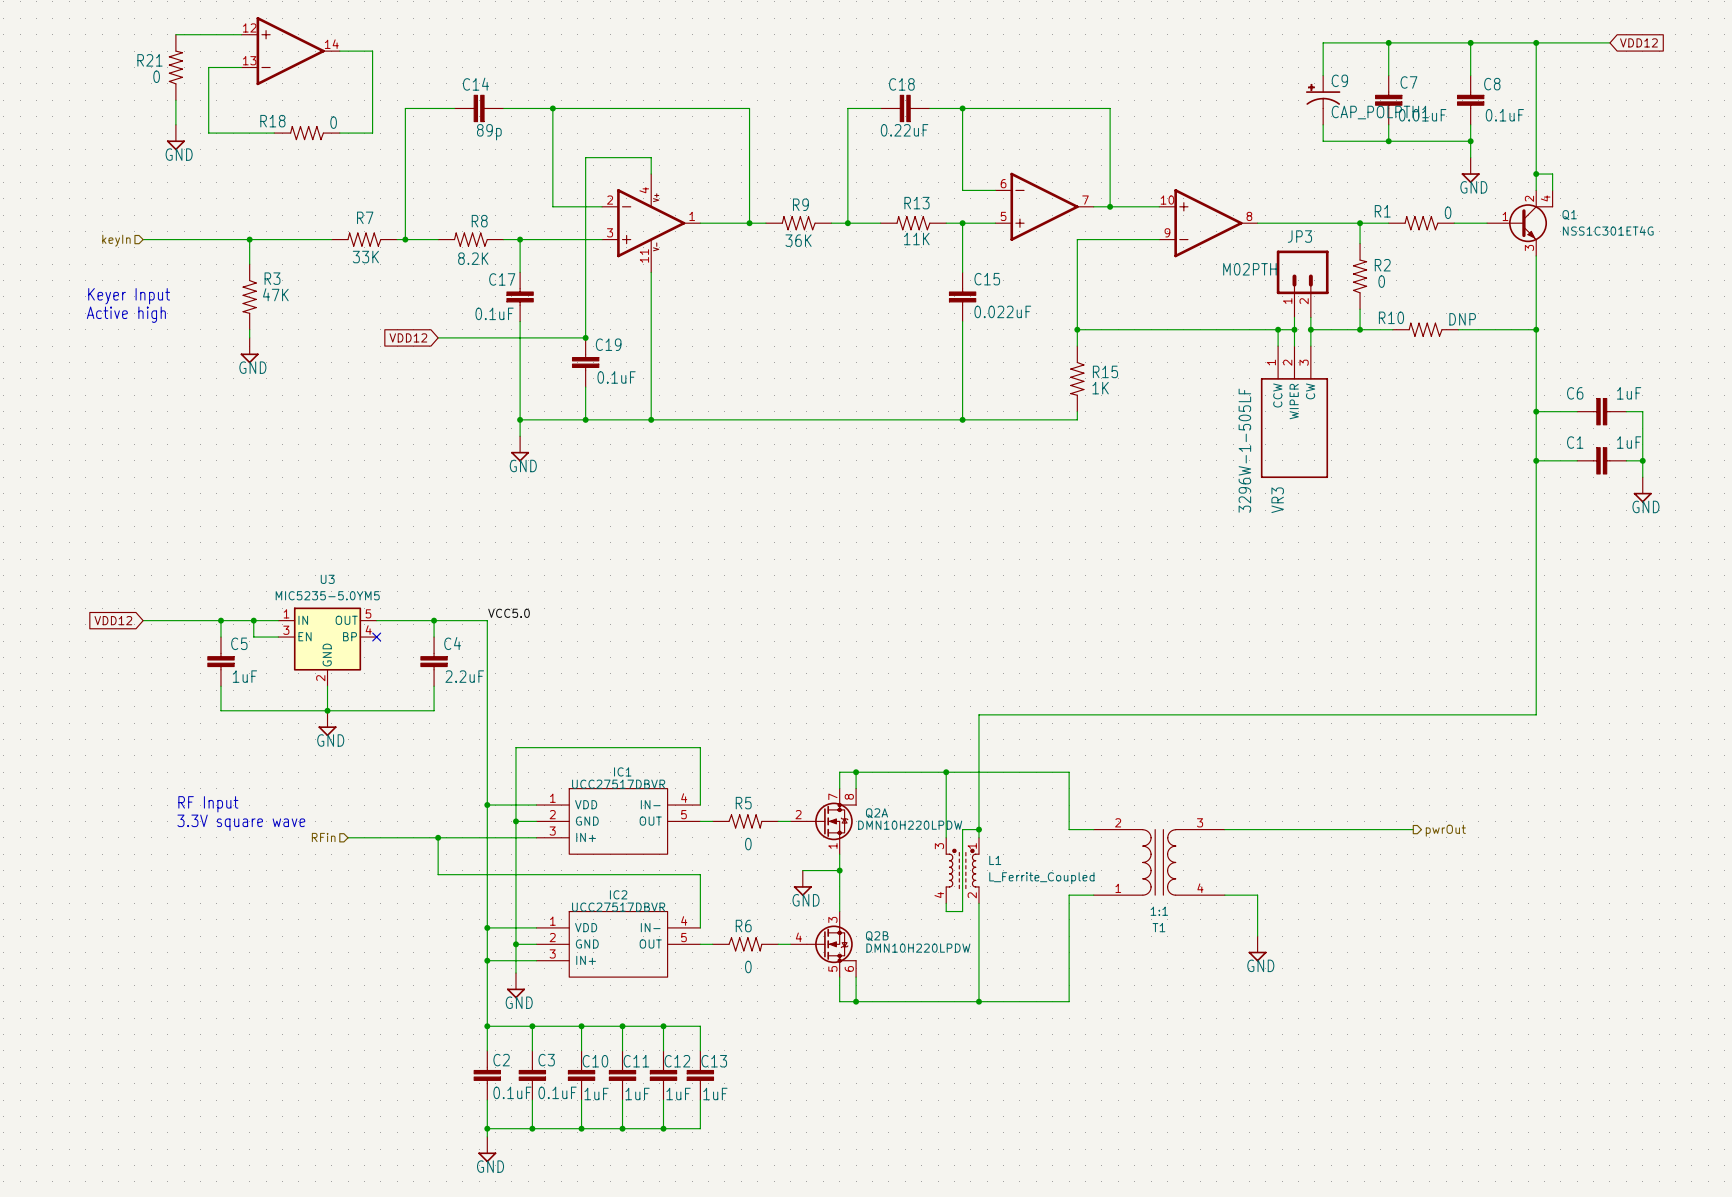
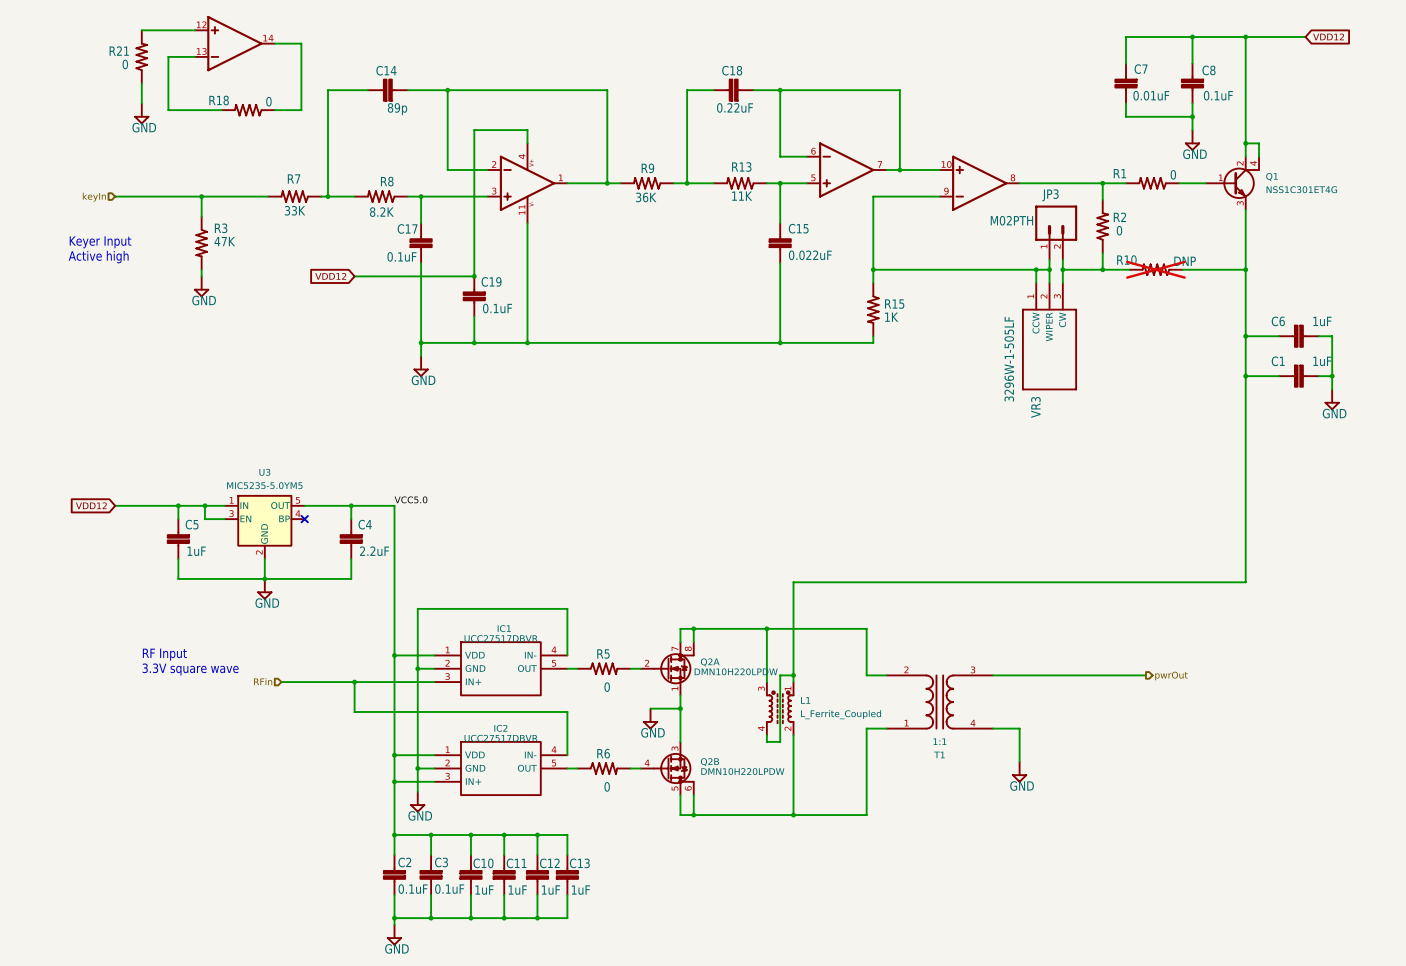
wire: (1388, 42) (1323, 42) (1323, 75) -> none
junction: (1388, 42) -> none
C9: CAP_POLPTH1 (1323, 100) -> none
wire: (1323, 124) (1323, 141) (1388, 141) -> none
junction: (1388, 141) -> none
R10 do-not-place cross: none -> (1155, 269)

